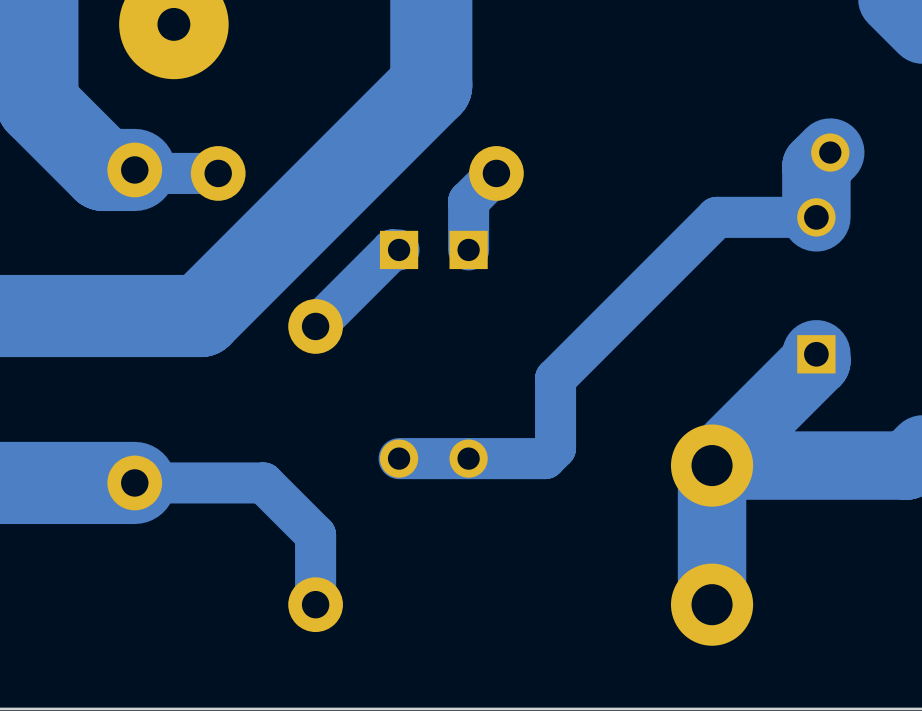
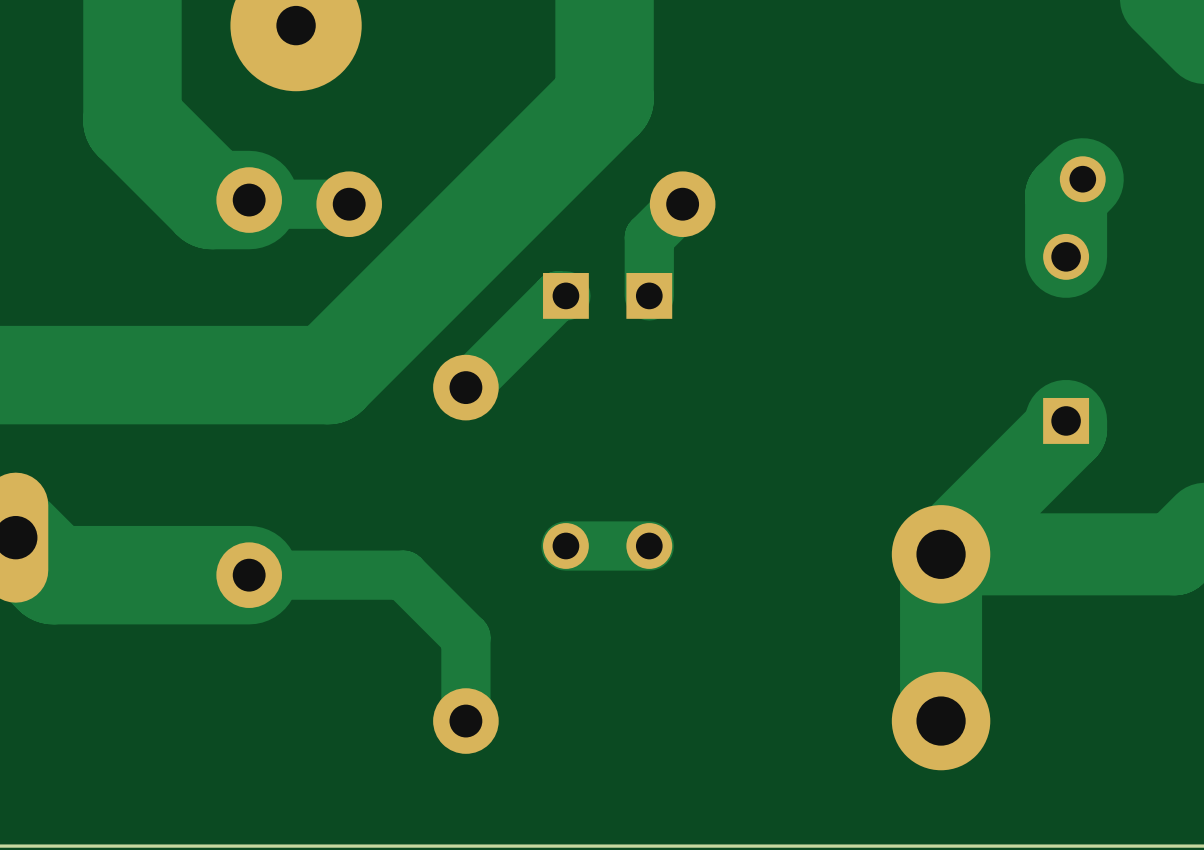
track: (816, 217) (716, 217) (555, 378) (555, 448) (545, 458) (468, 458) -> none

